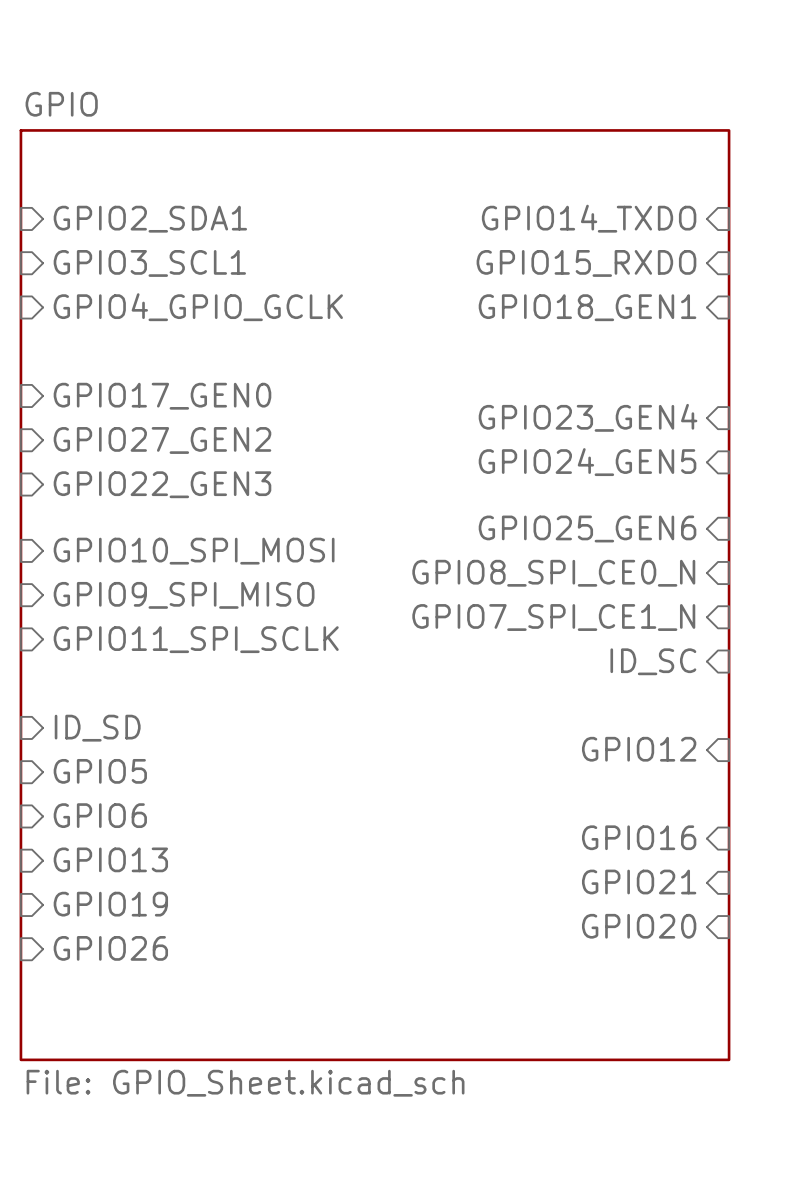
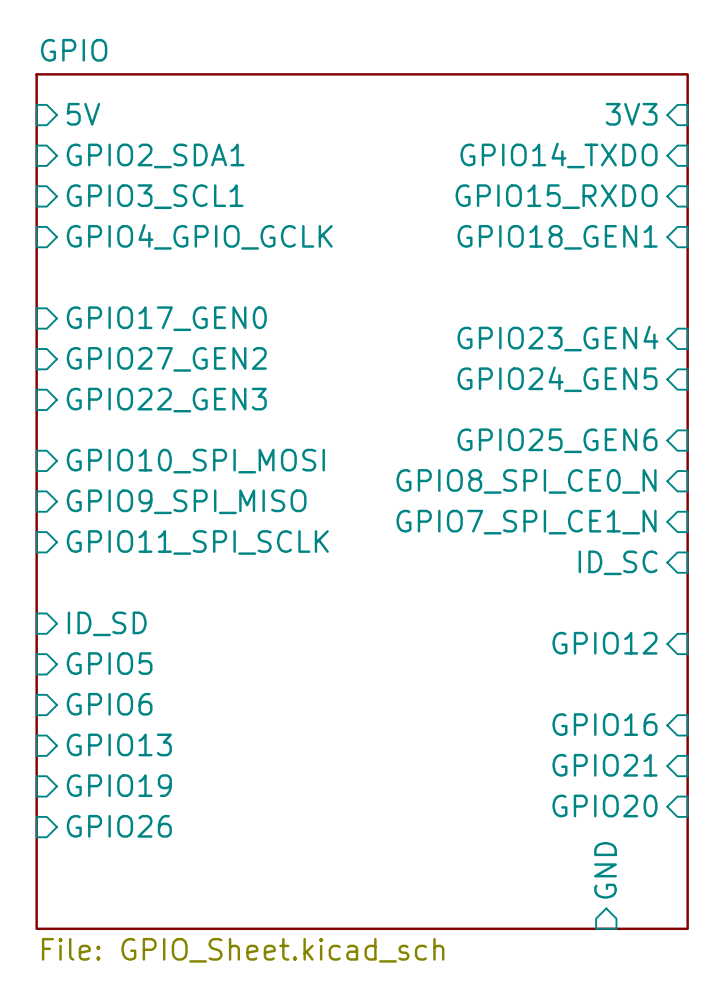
sheet pin: none -> 5V (83, 114)
sheet pin: none -> 3V3 (631, 114)
sheet pin: none -> GND (605, 870)

